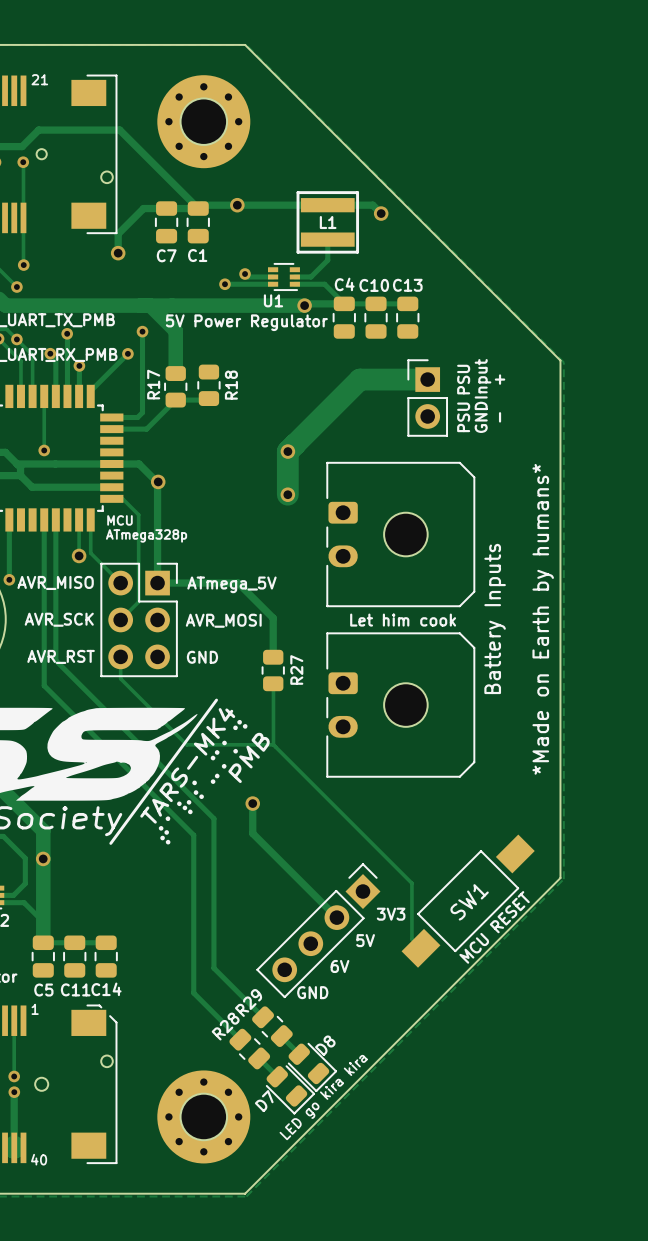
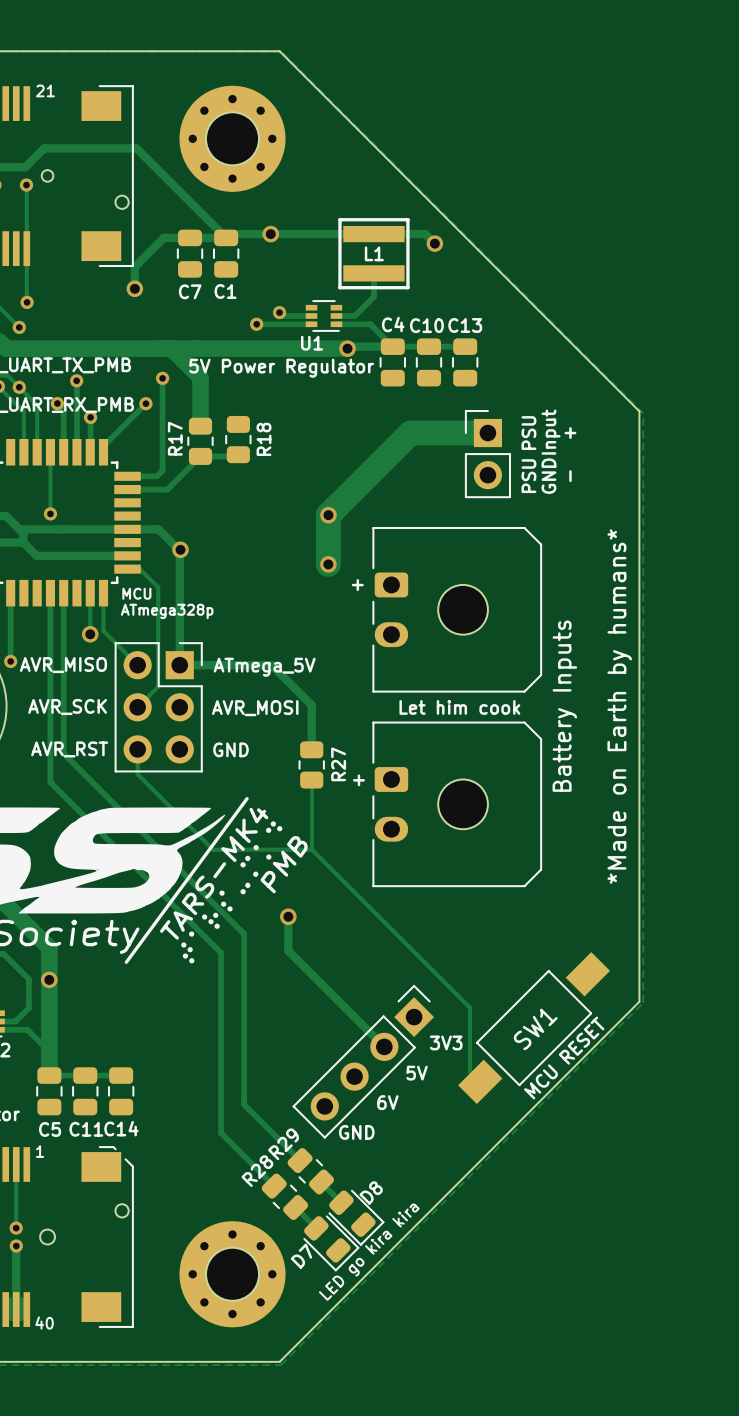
text: none -> + (357, 585)
text: none -> + (358, 780)

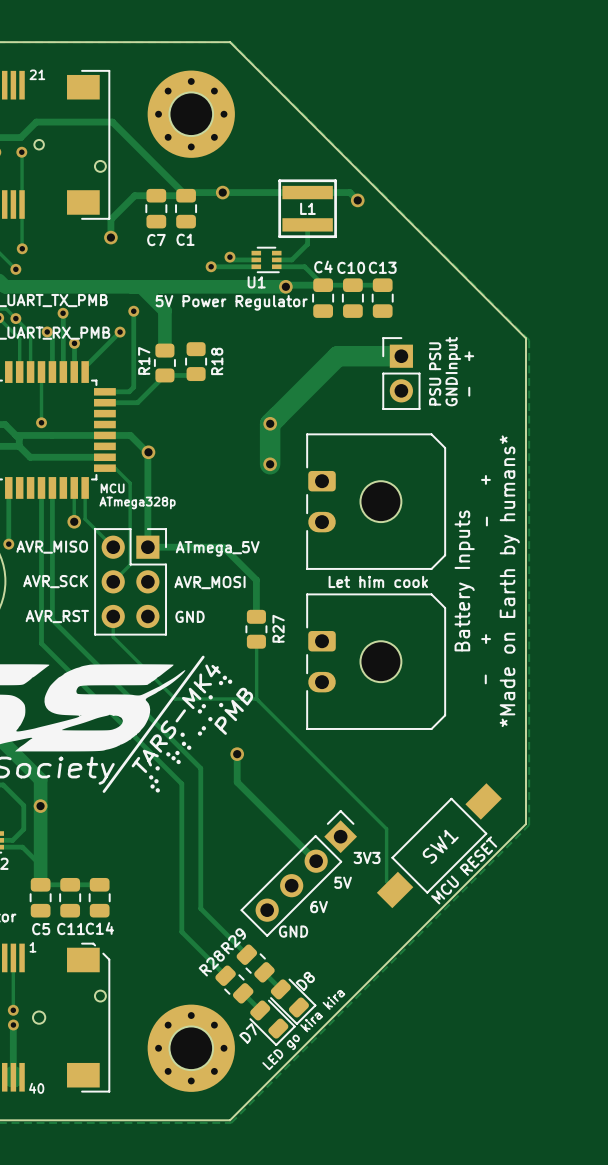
text: none -> + (485, 479)
text: + (357, 585) -> none
text: none -> - (486, 521)
text: none -> + (486, 639)
text: + (358, 780) -> none
text: none -> - (485, 679)

